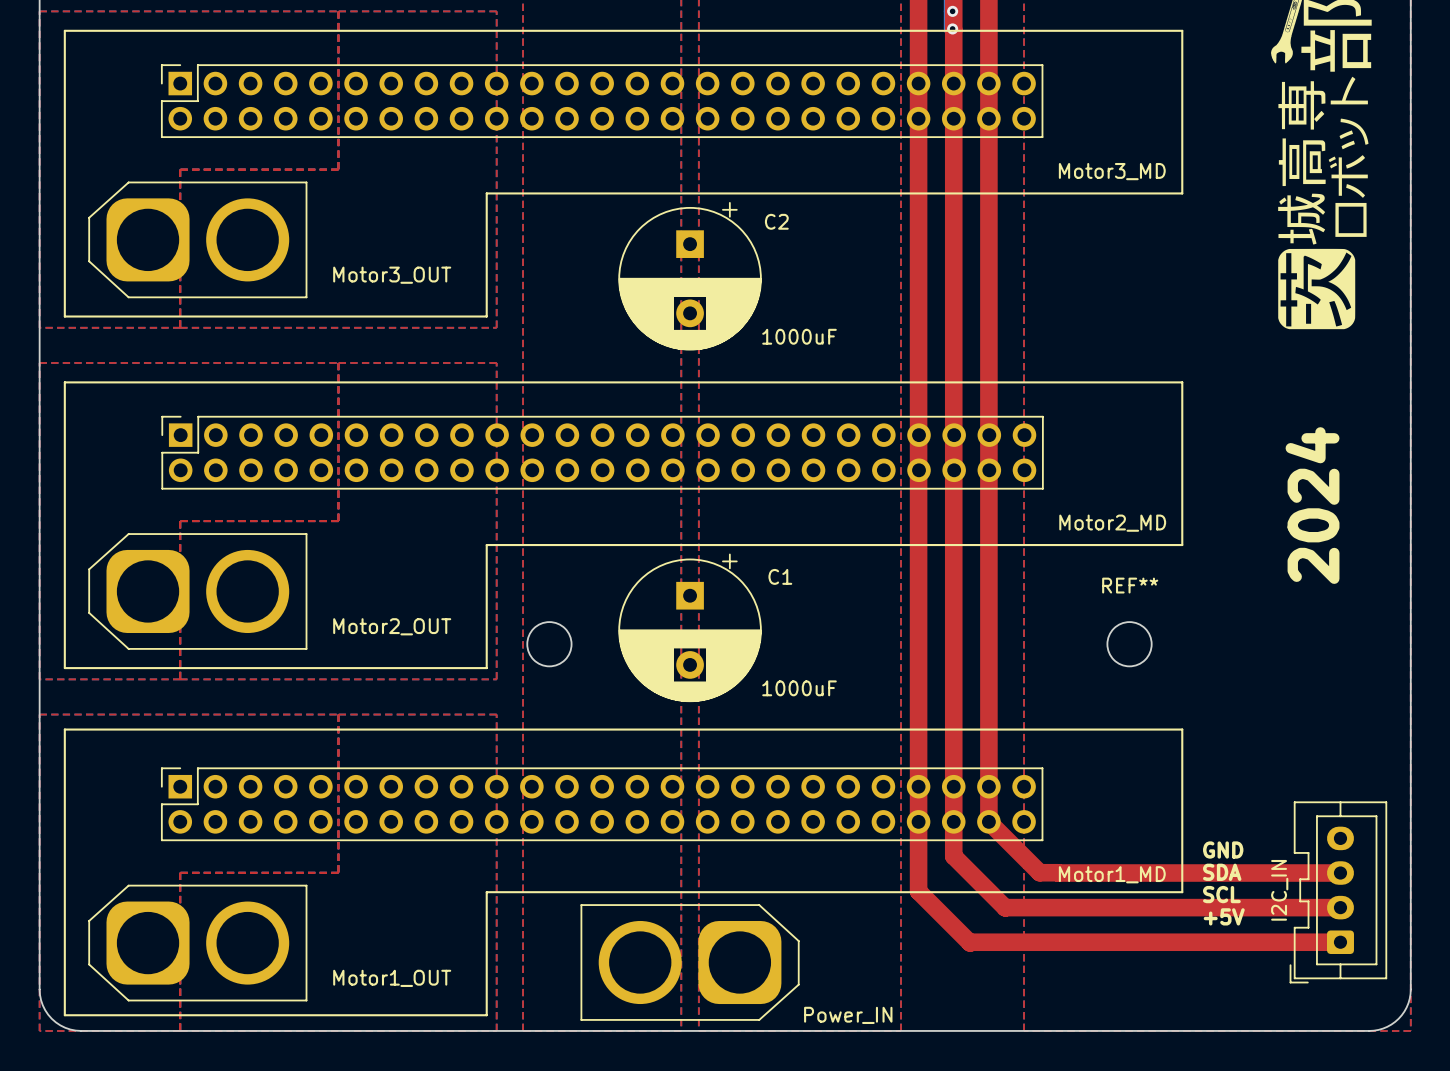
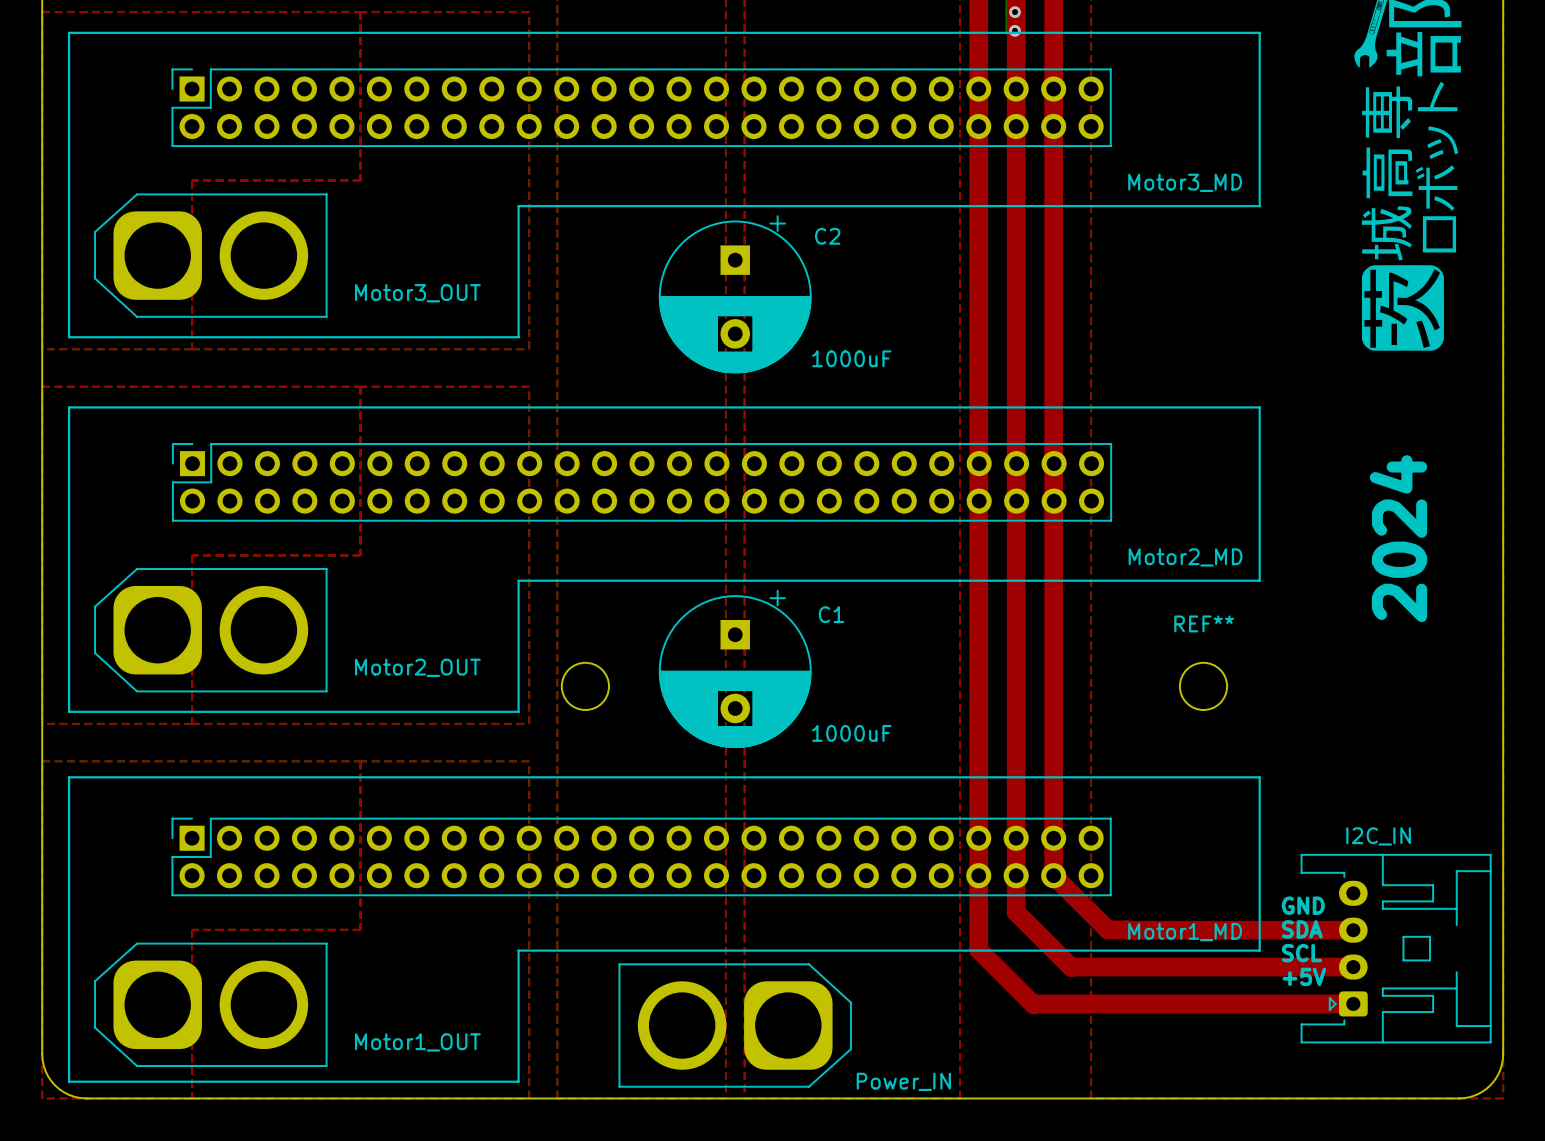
top track: (1270, 873) (1340, 873) -> none
part: none -> I2C_IN (1396, 948)
I2C_IN: (1338, 892) -> none
top track: (1270, 907) (1340, 907) -> none
top track: (1270, 942) (1340, 942) -> none

